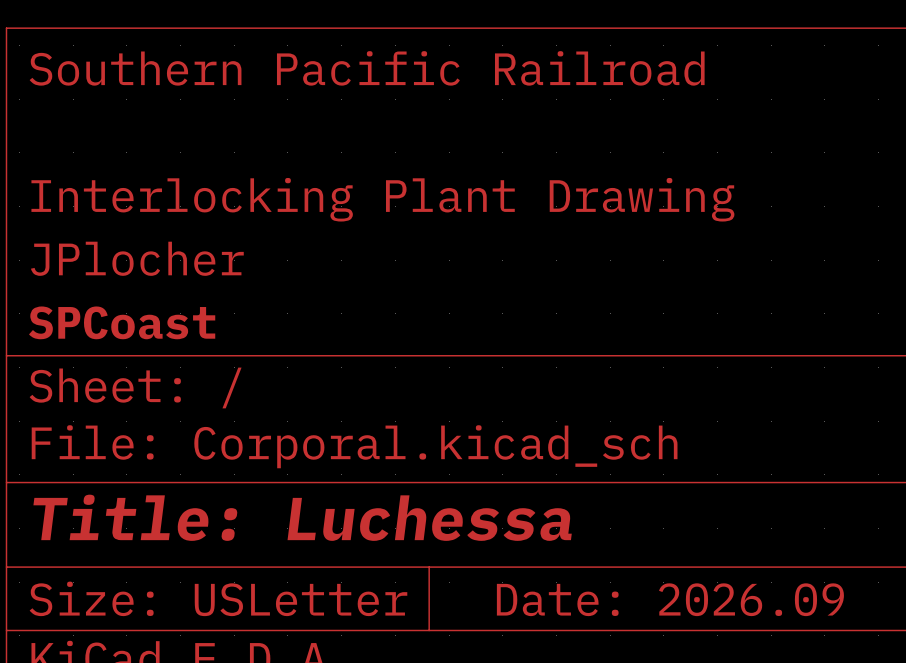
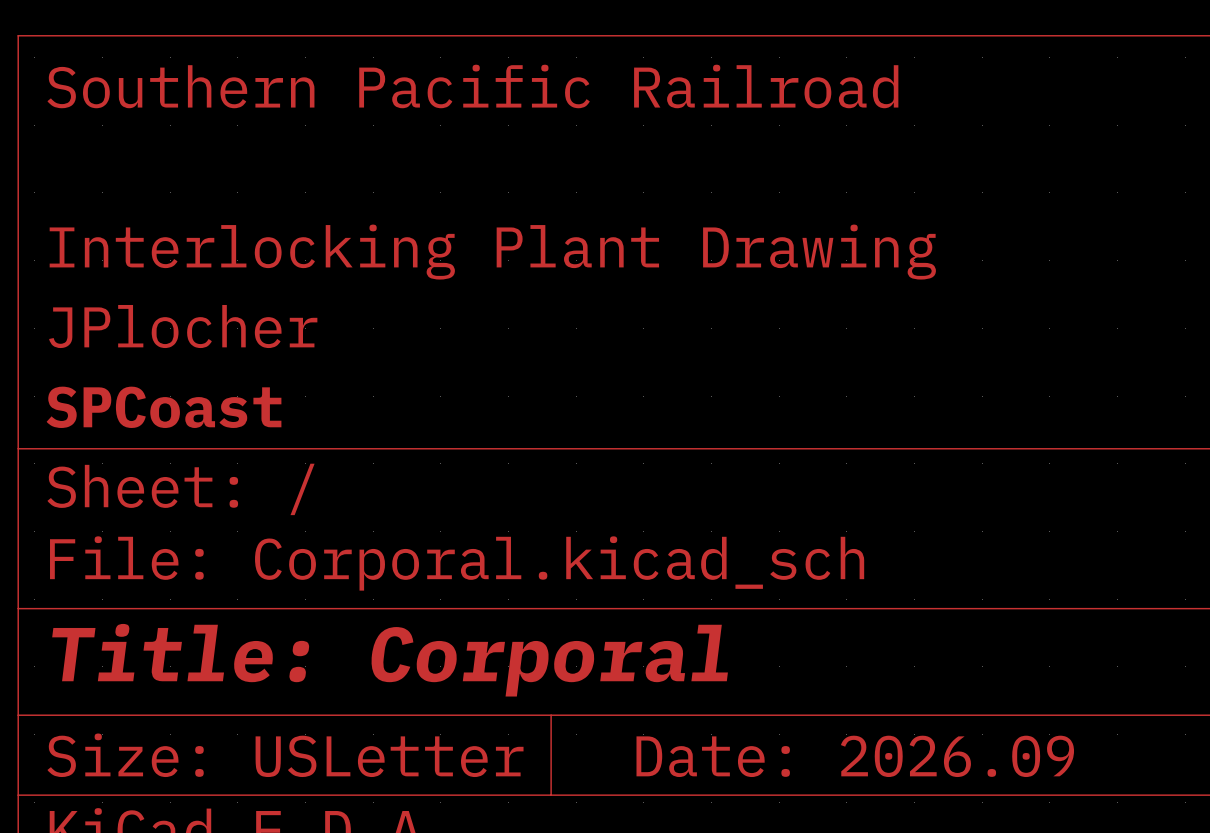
title block: Title: Luchessa (302, 517) -> Title: Corporal (390, 660)

